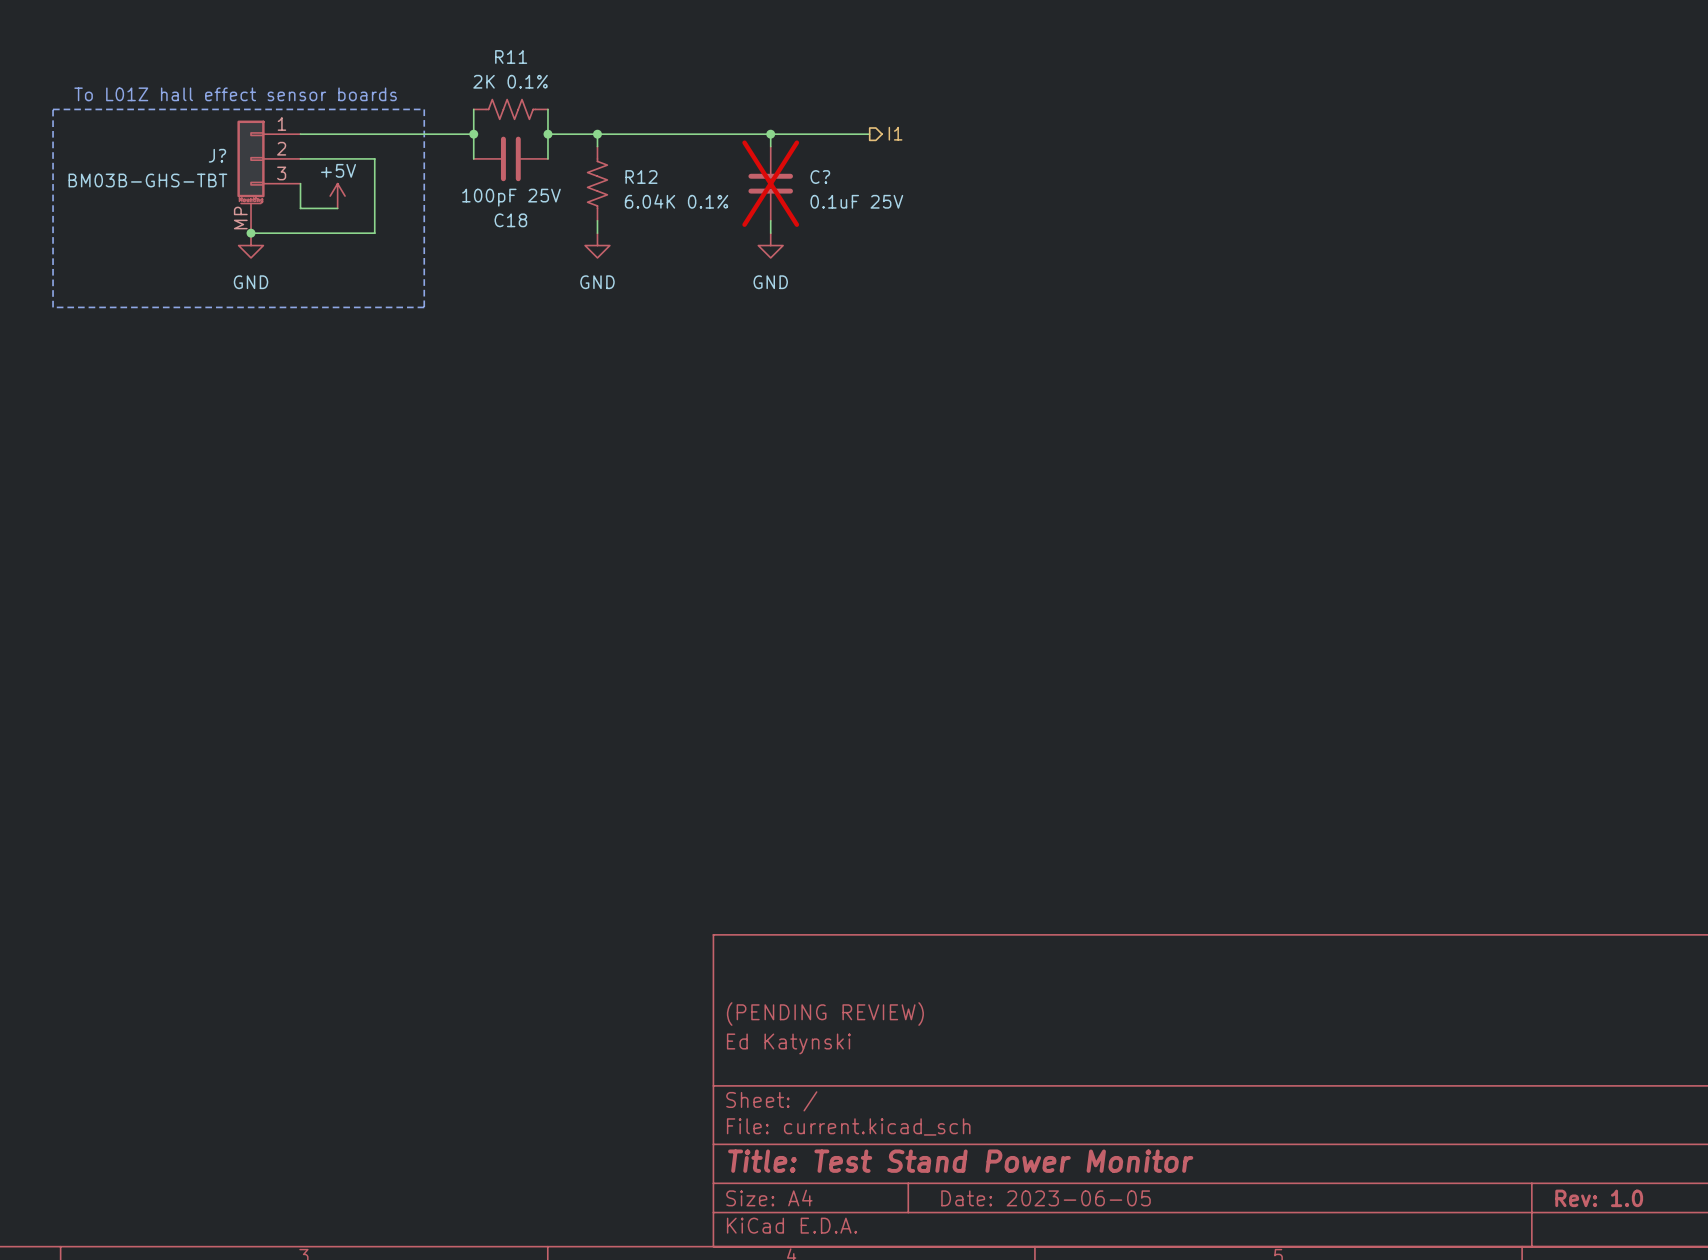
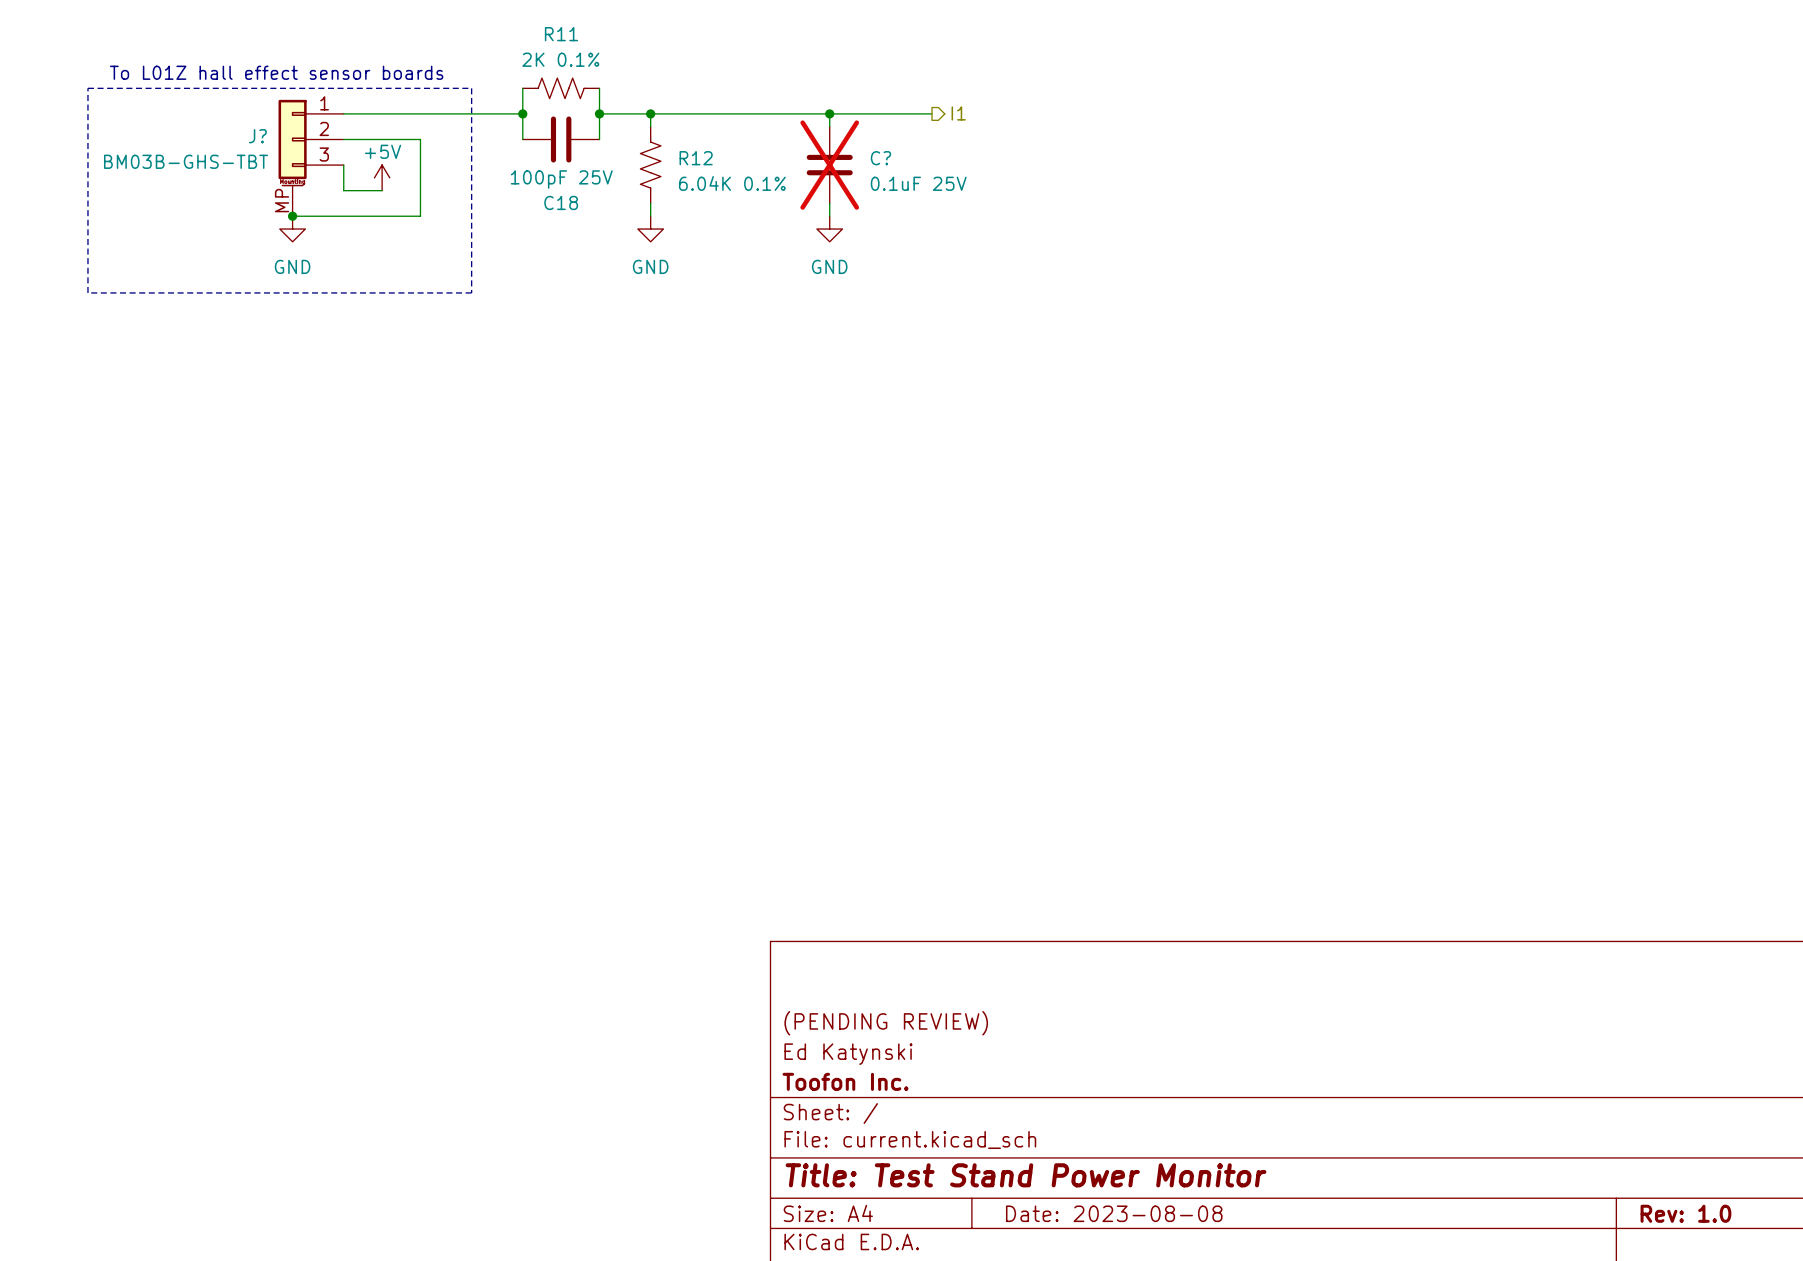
title block: none -> Toofon Inc. (845, 1081)
title block: Date: 2023-06-05 (1046, 1198) -> Date: 2023-08-08 (1114, 1213)

